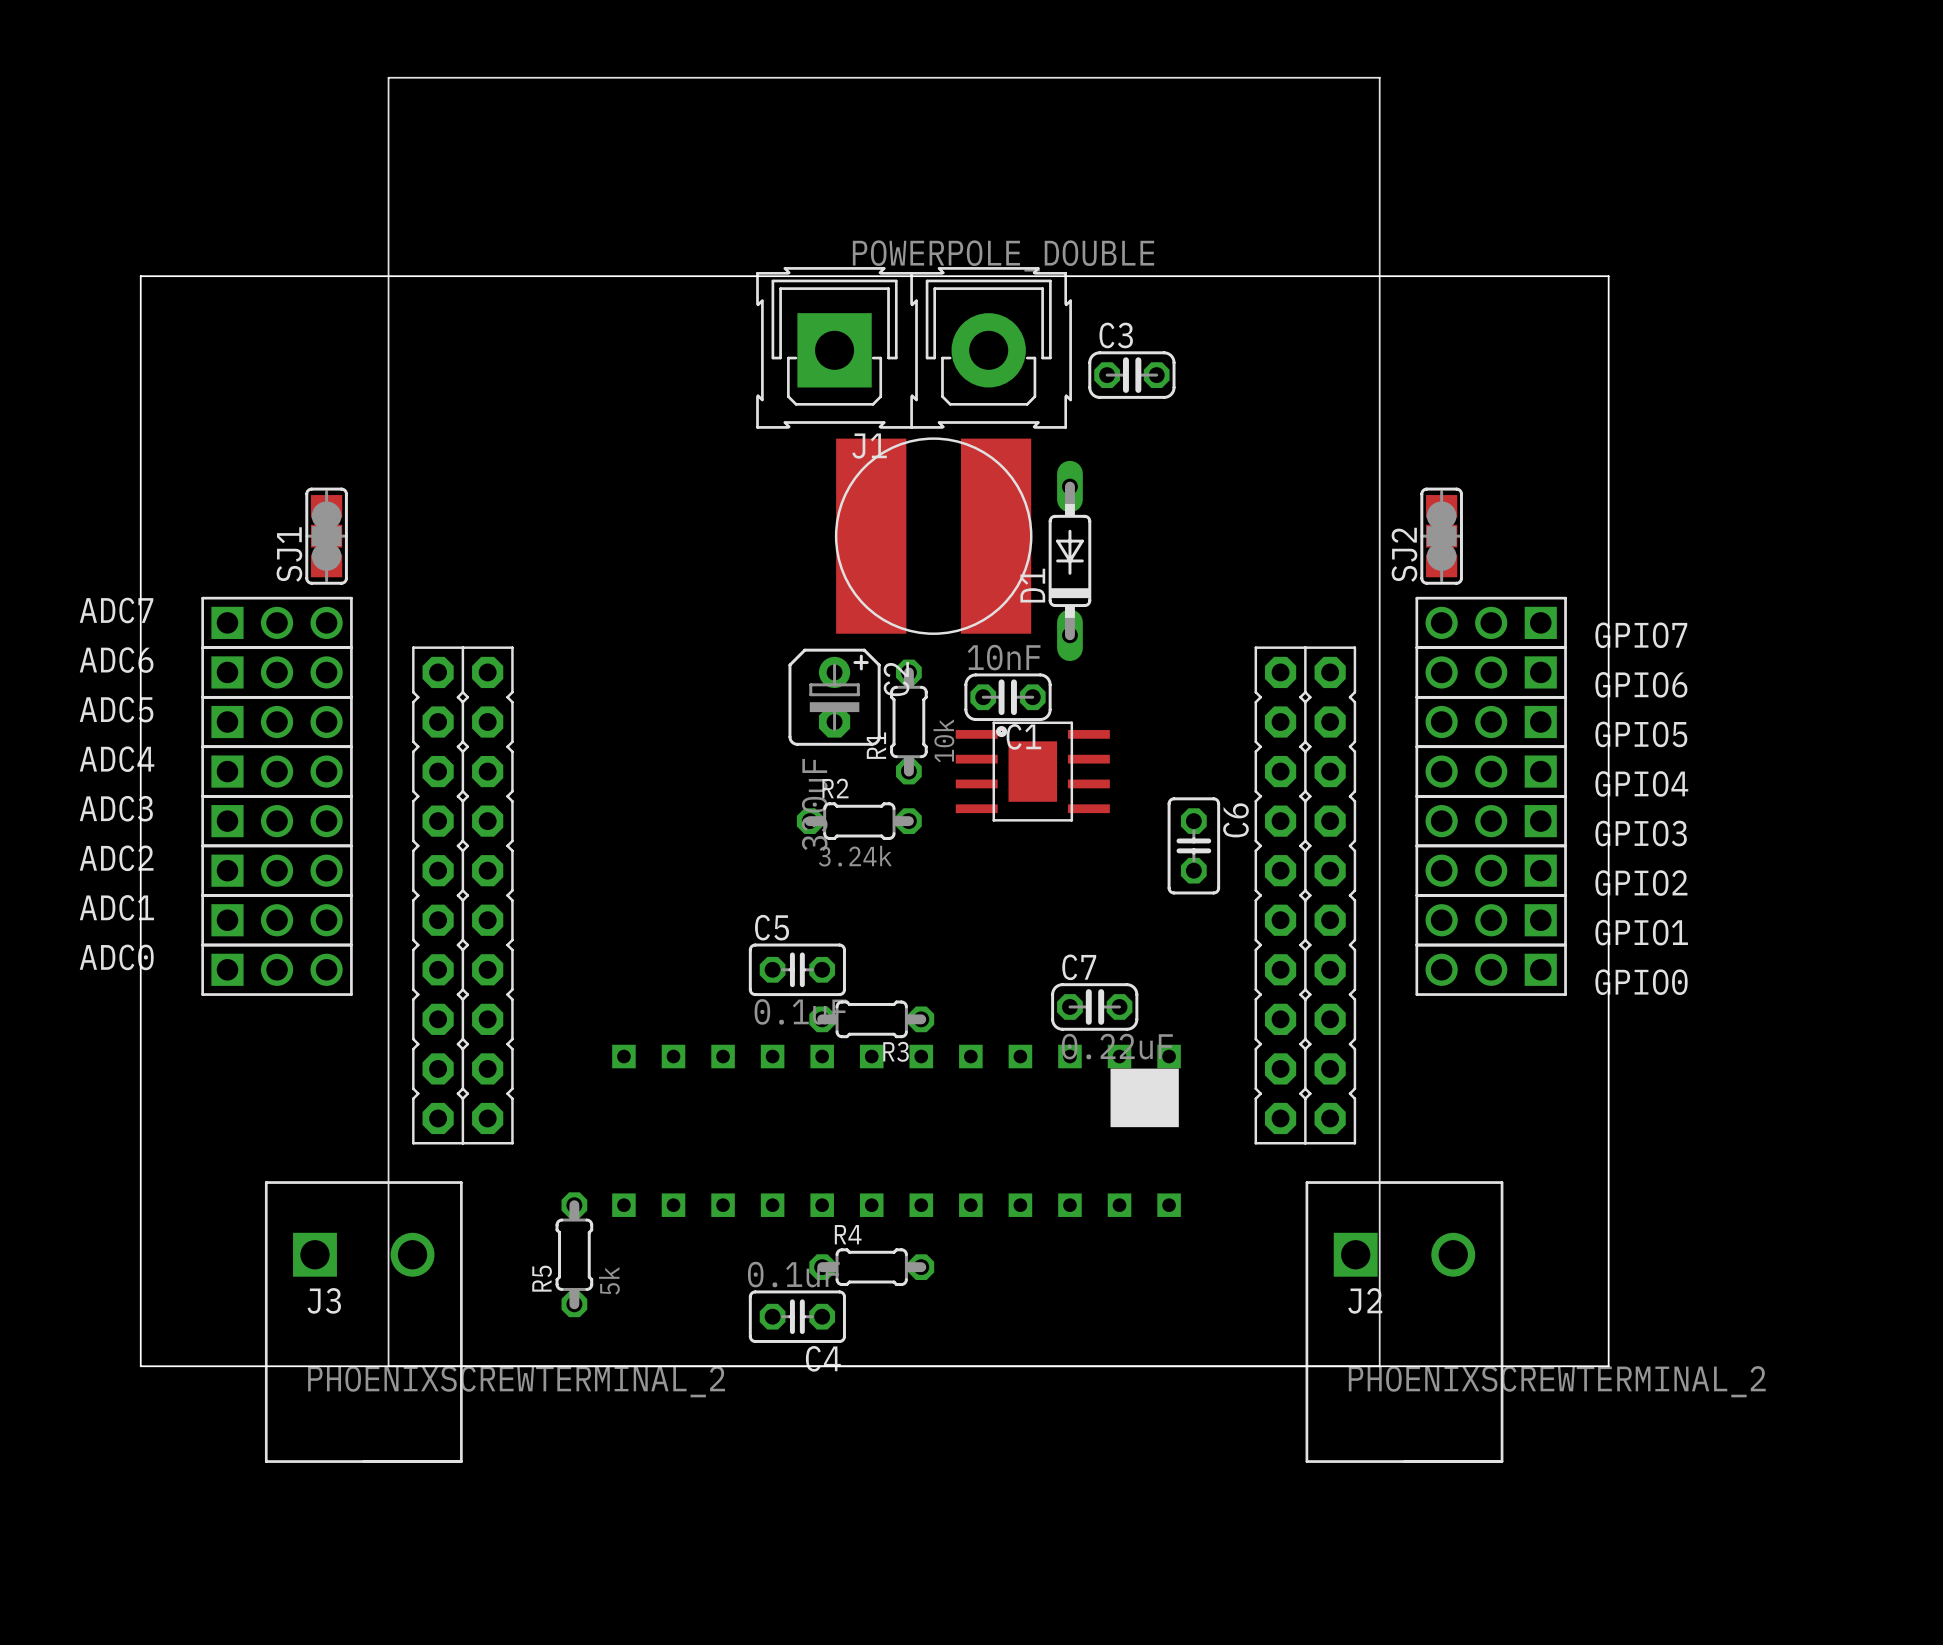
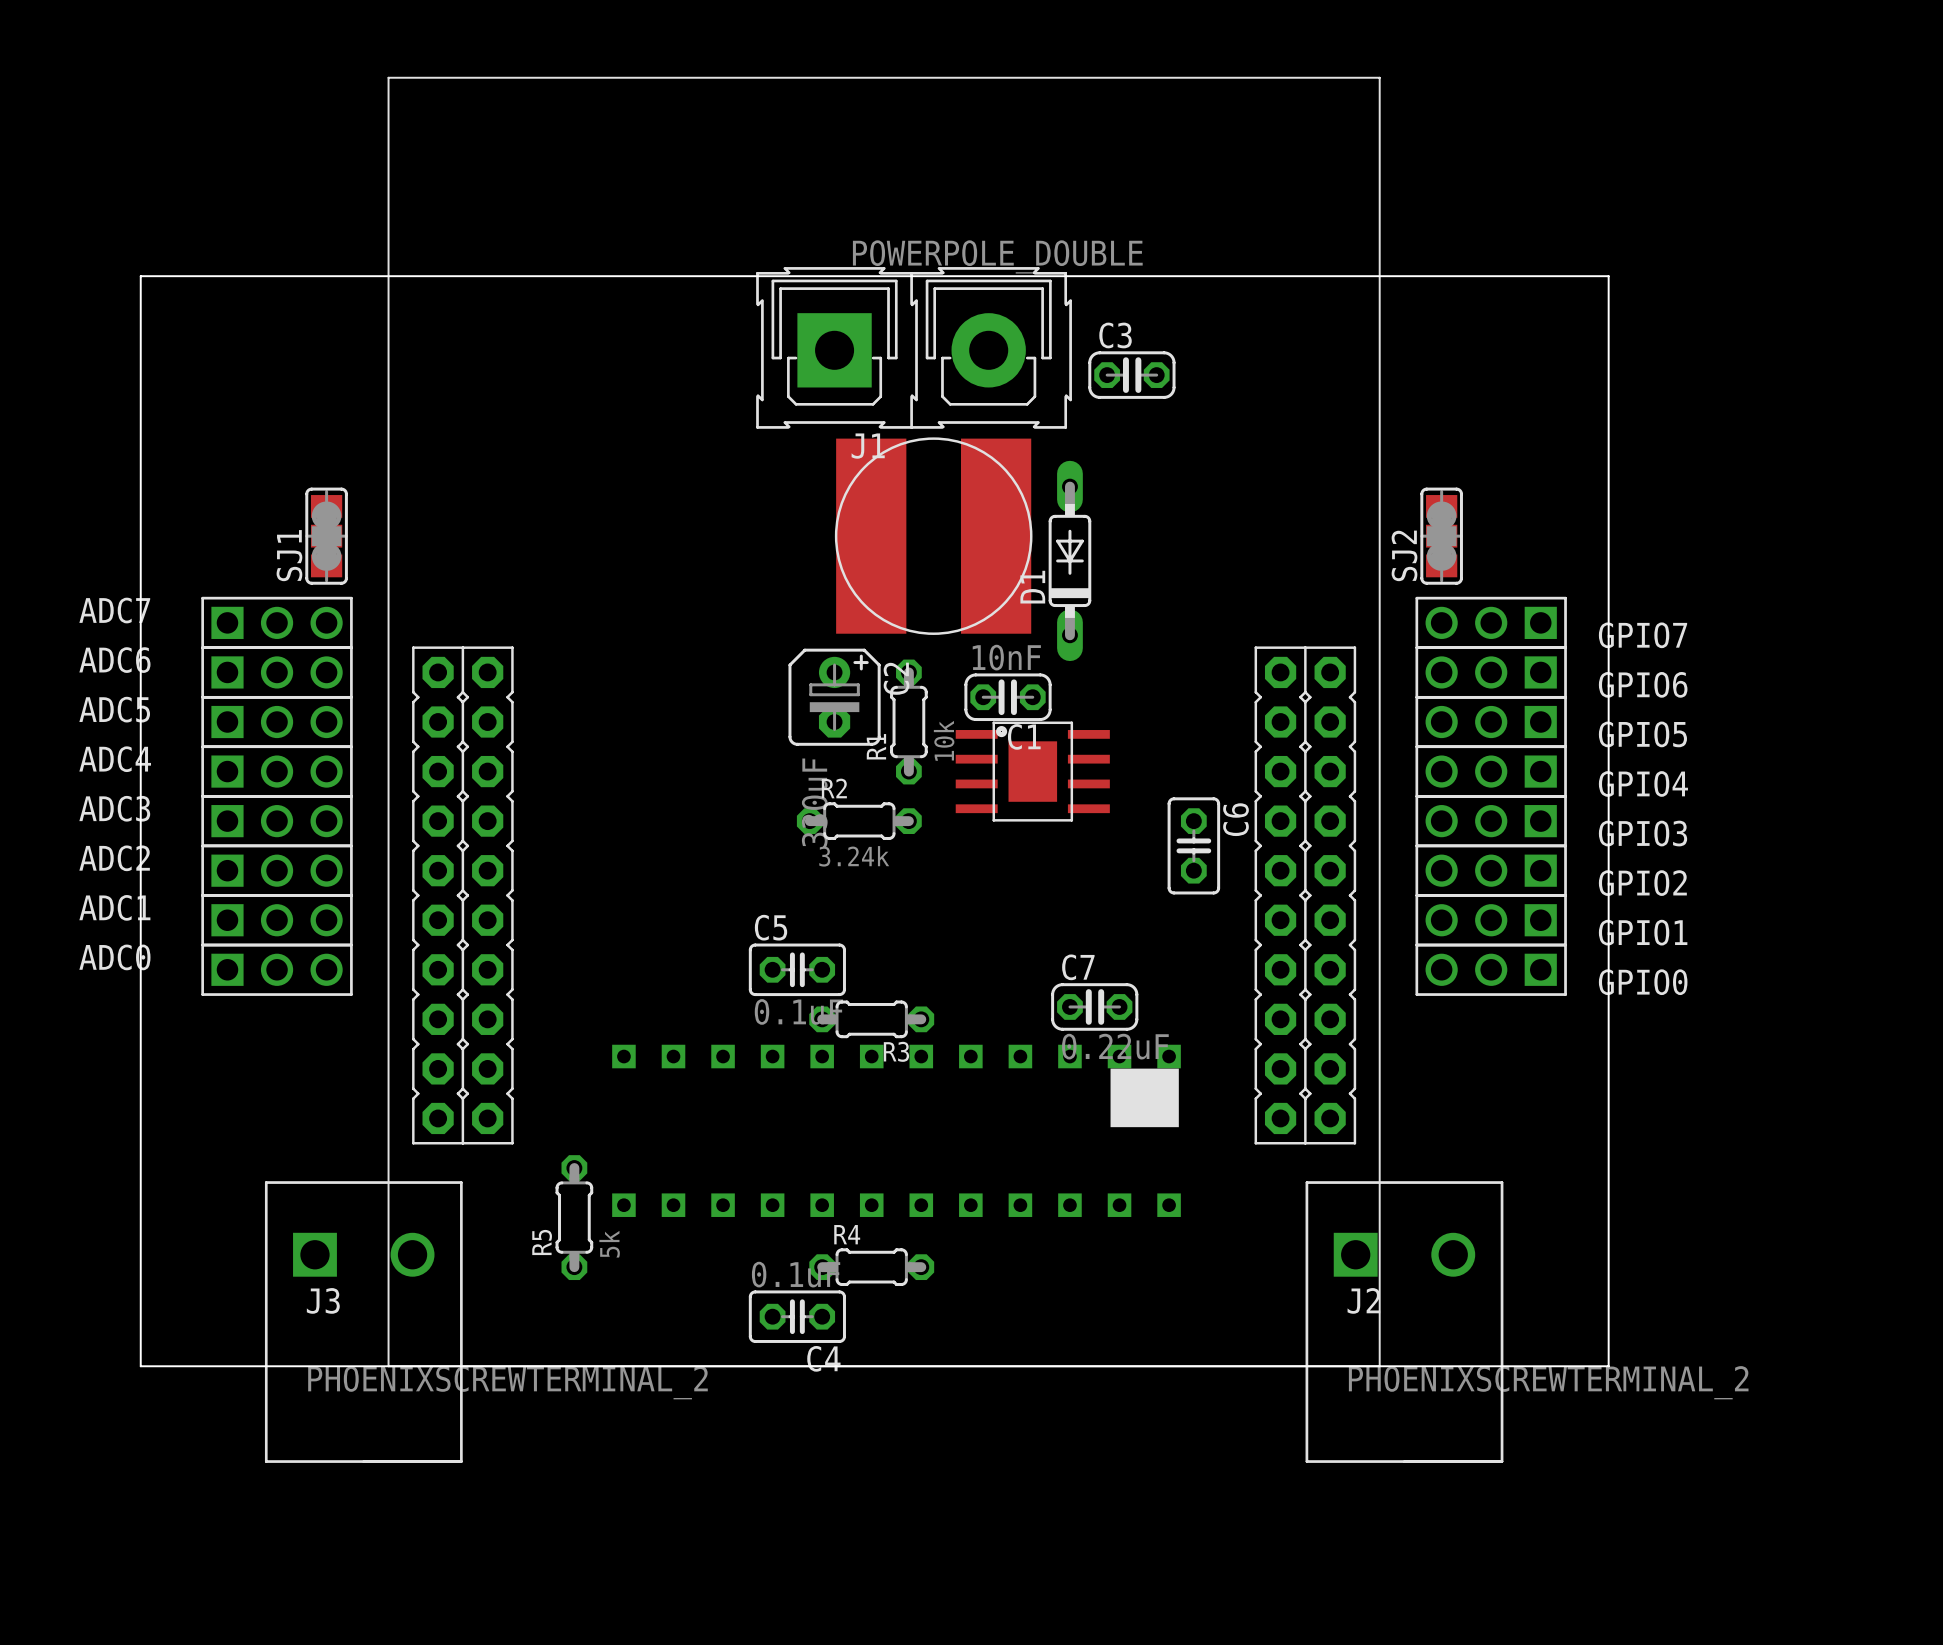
R5 position: (574, 1254) -> (574, 1217)

